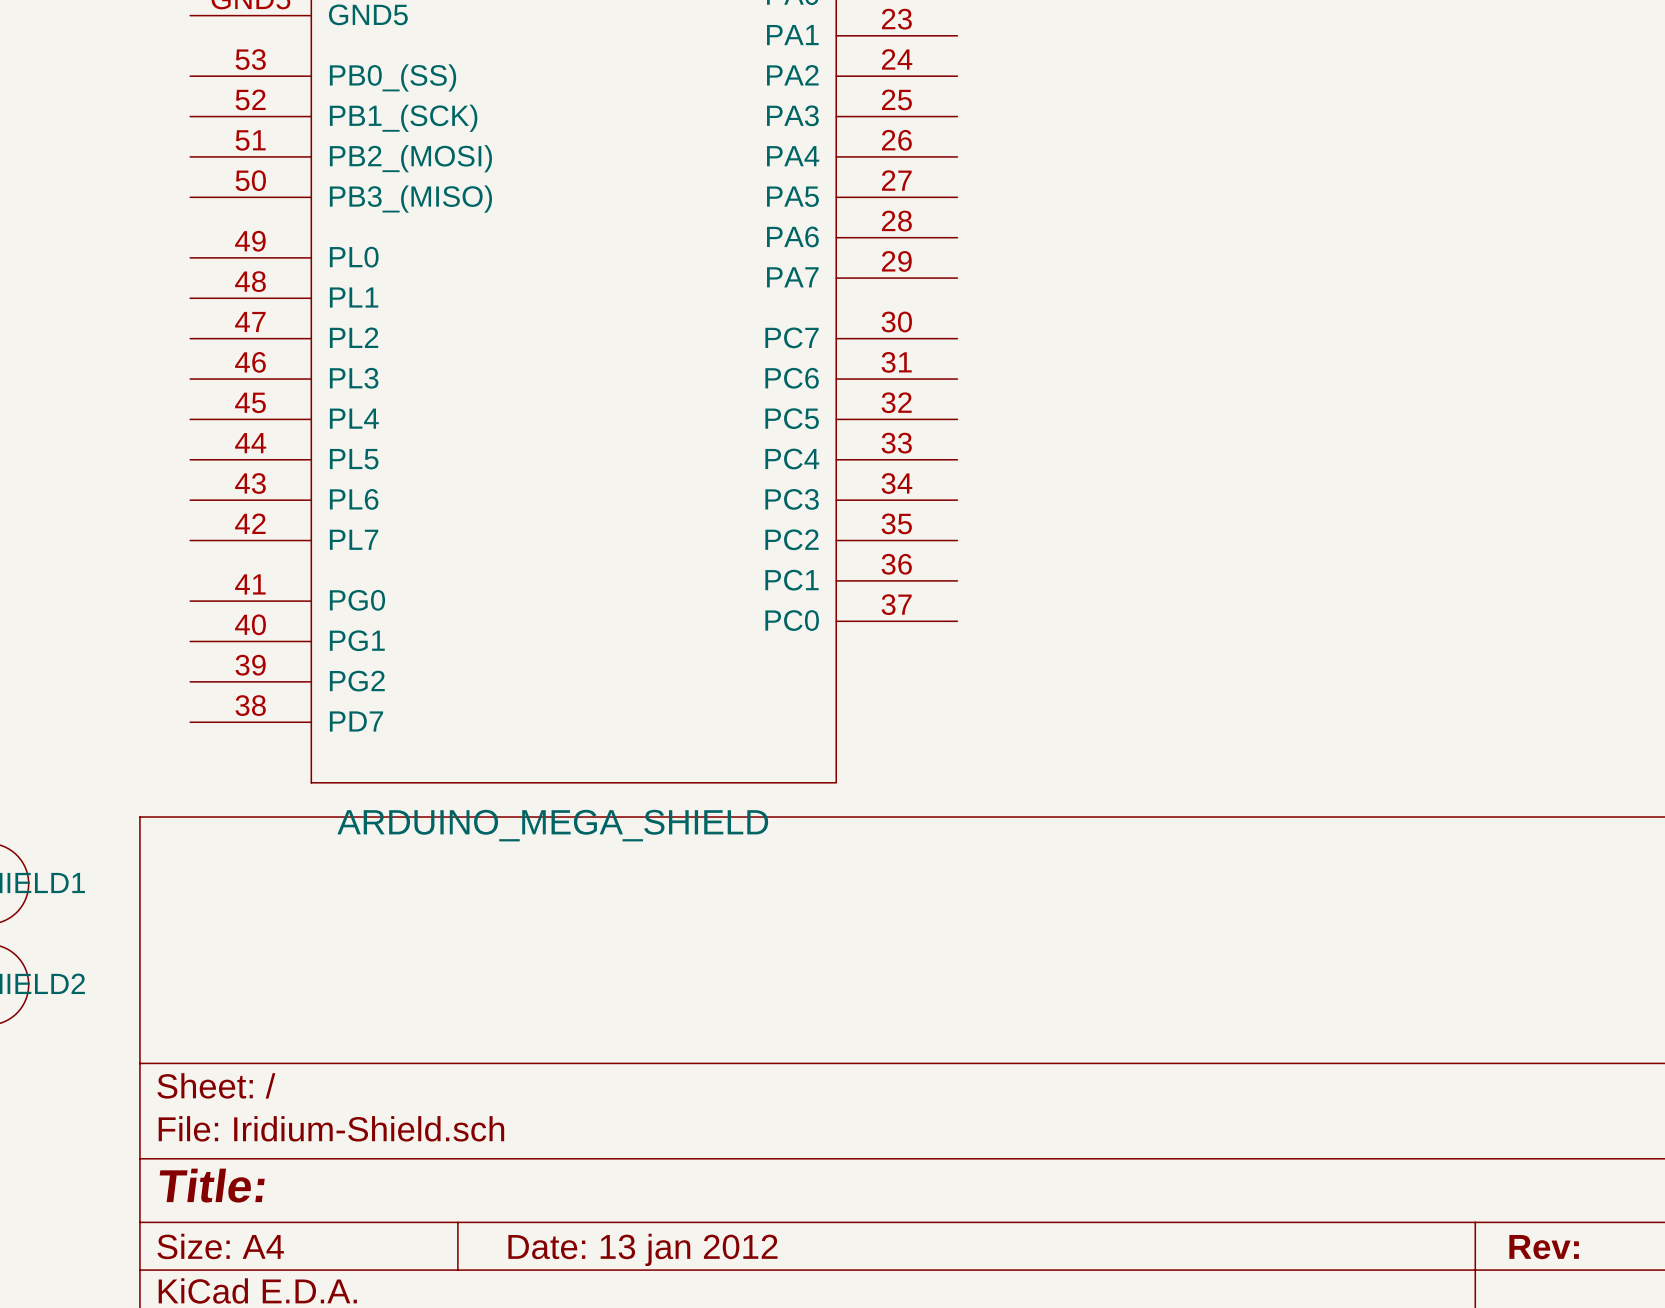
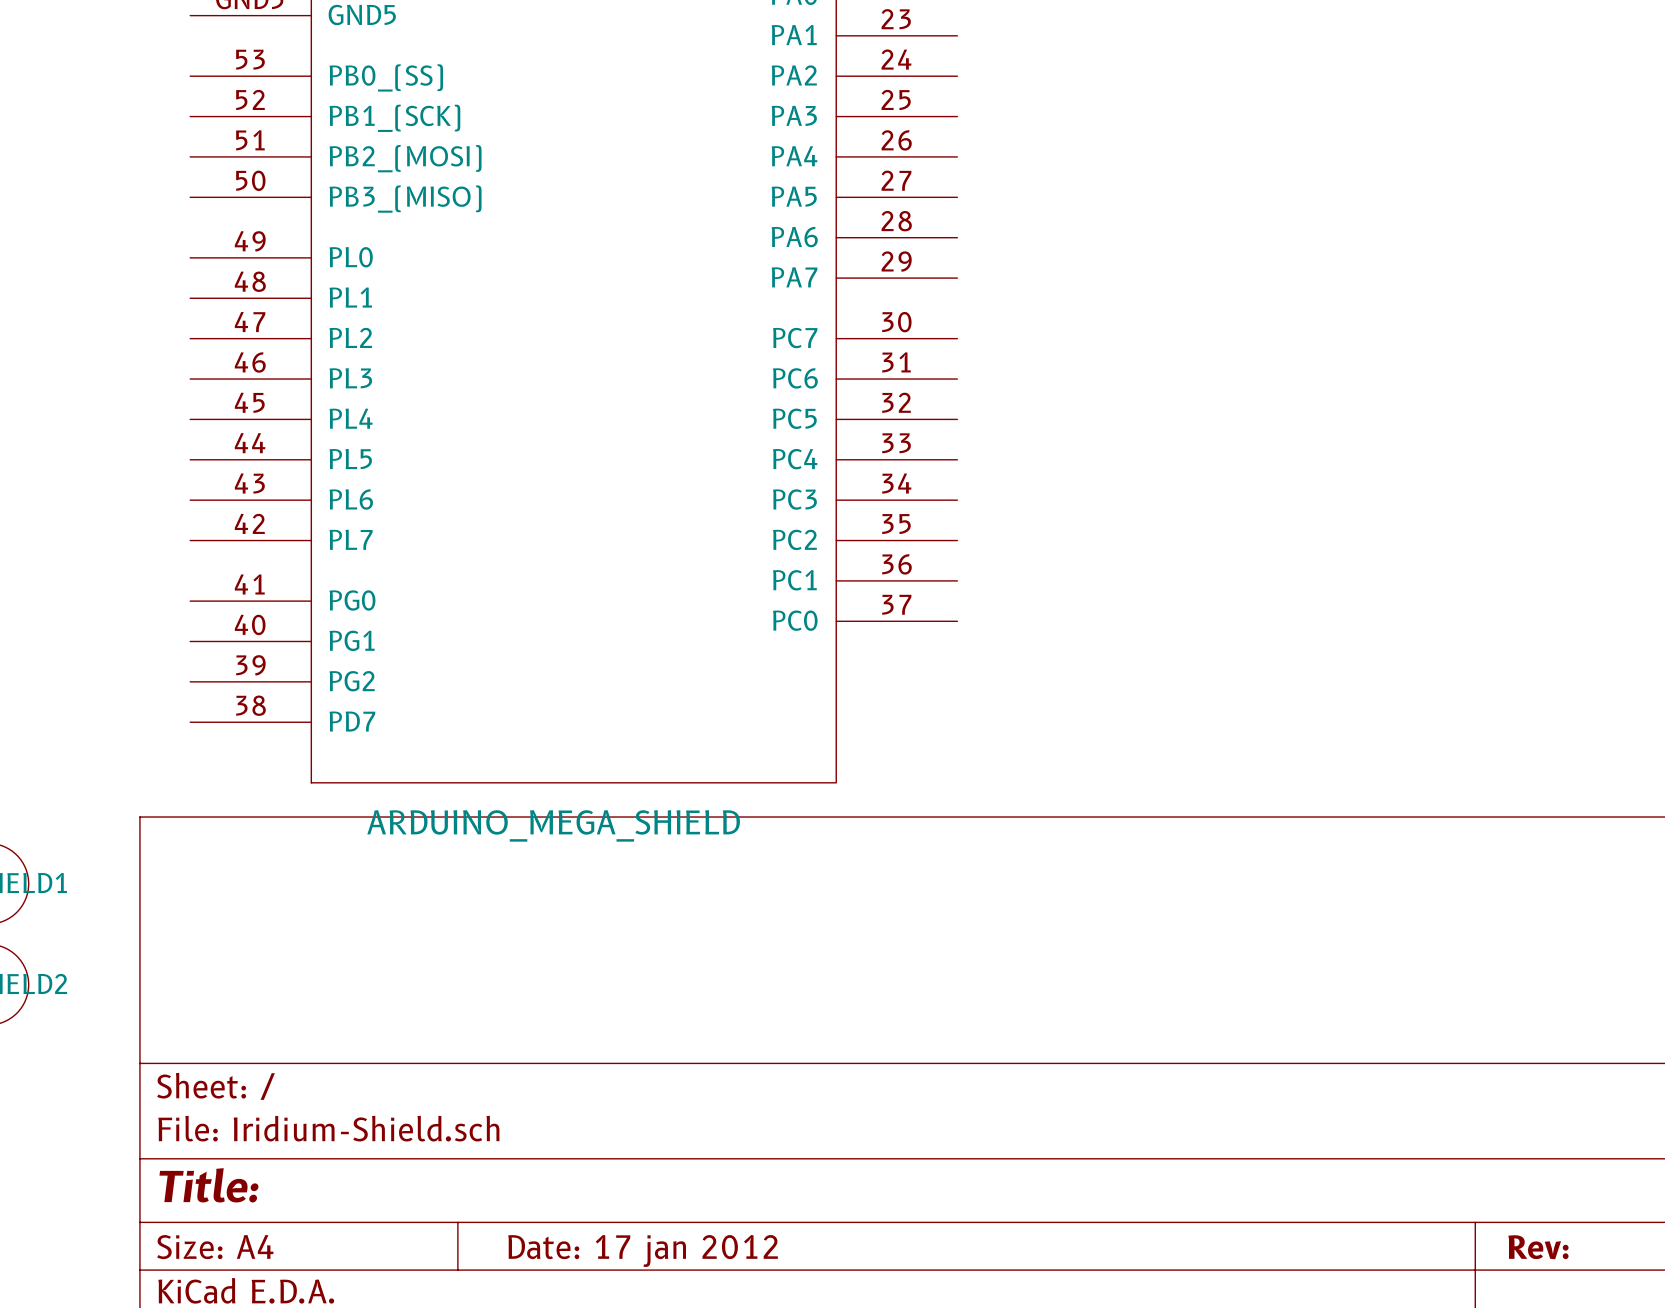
title block: Date: 13 jan 2012 (642, 1249) -> Date: 17 jan 2012 (643, 1250)

